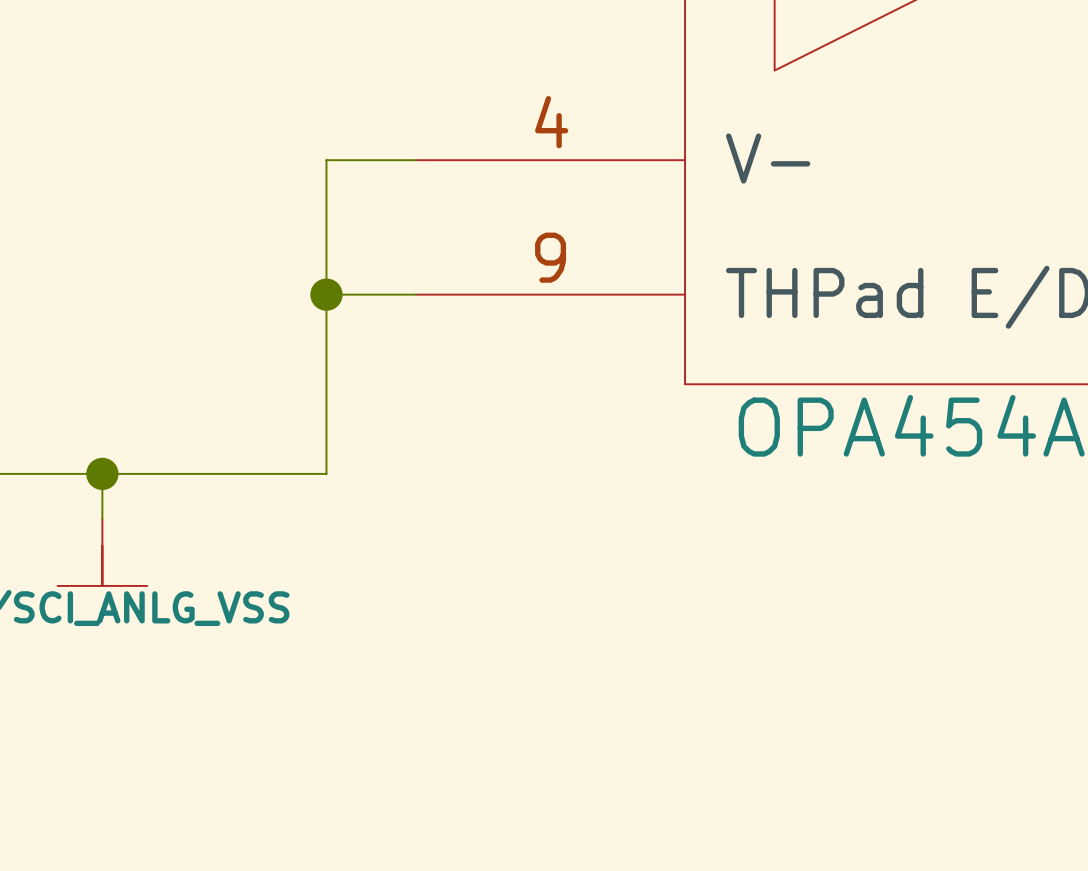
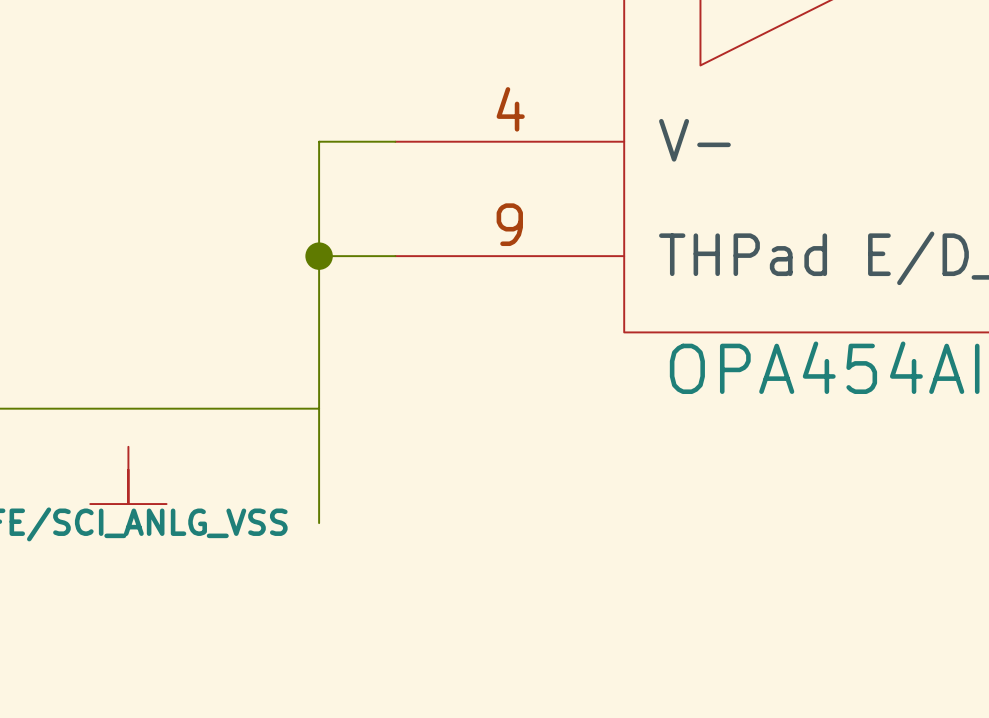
wire: (102, 473) (102, 518) -> none
junction: (102, 473) -> none
wire: none -> (319, 408) (319, 523)

